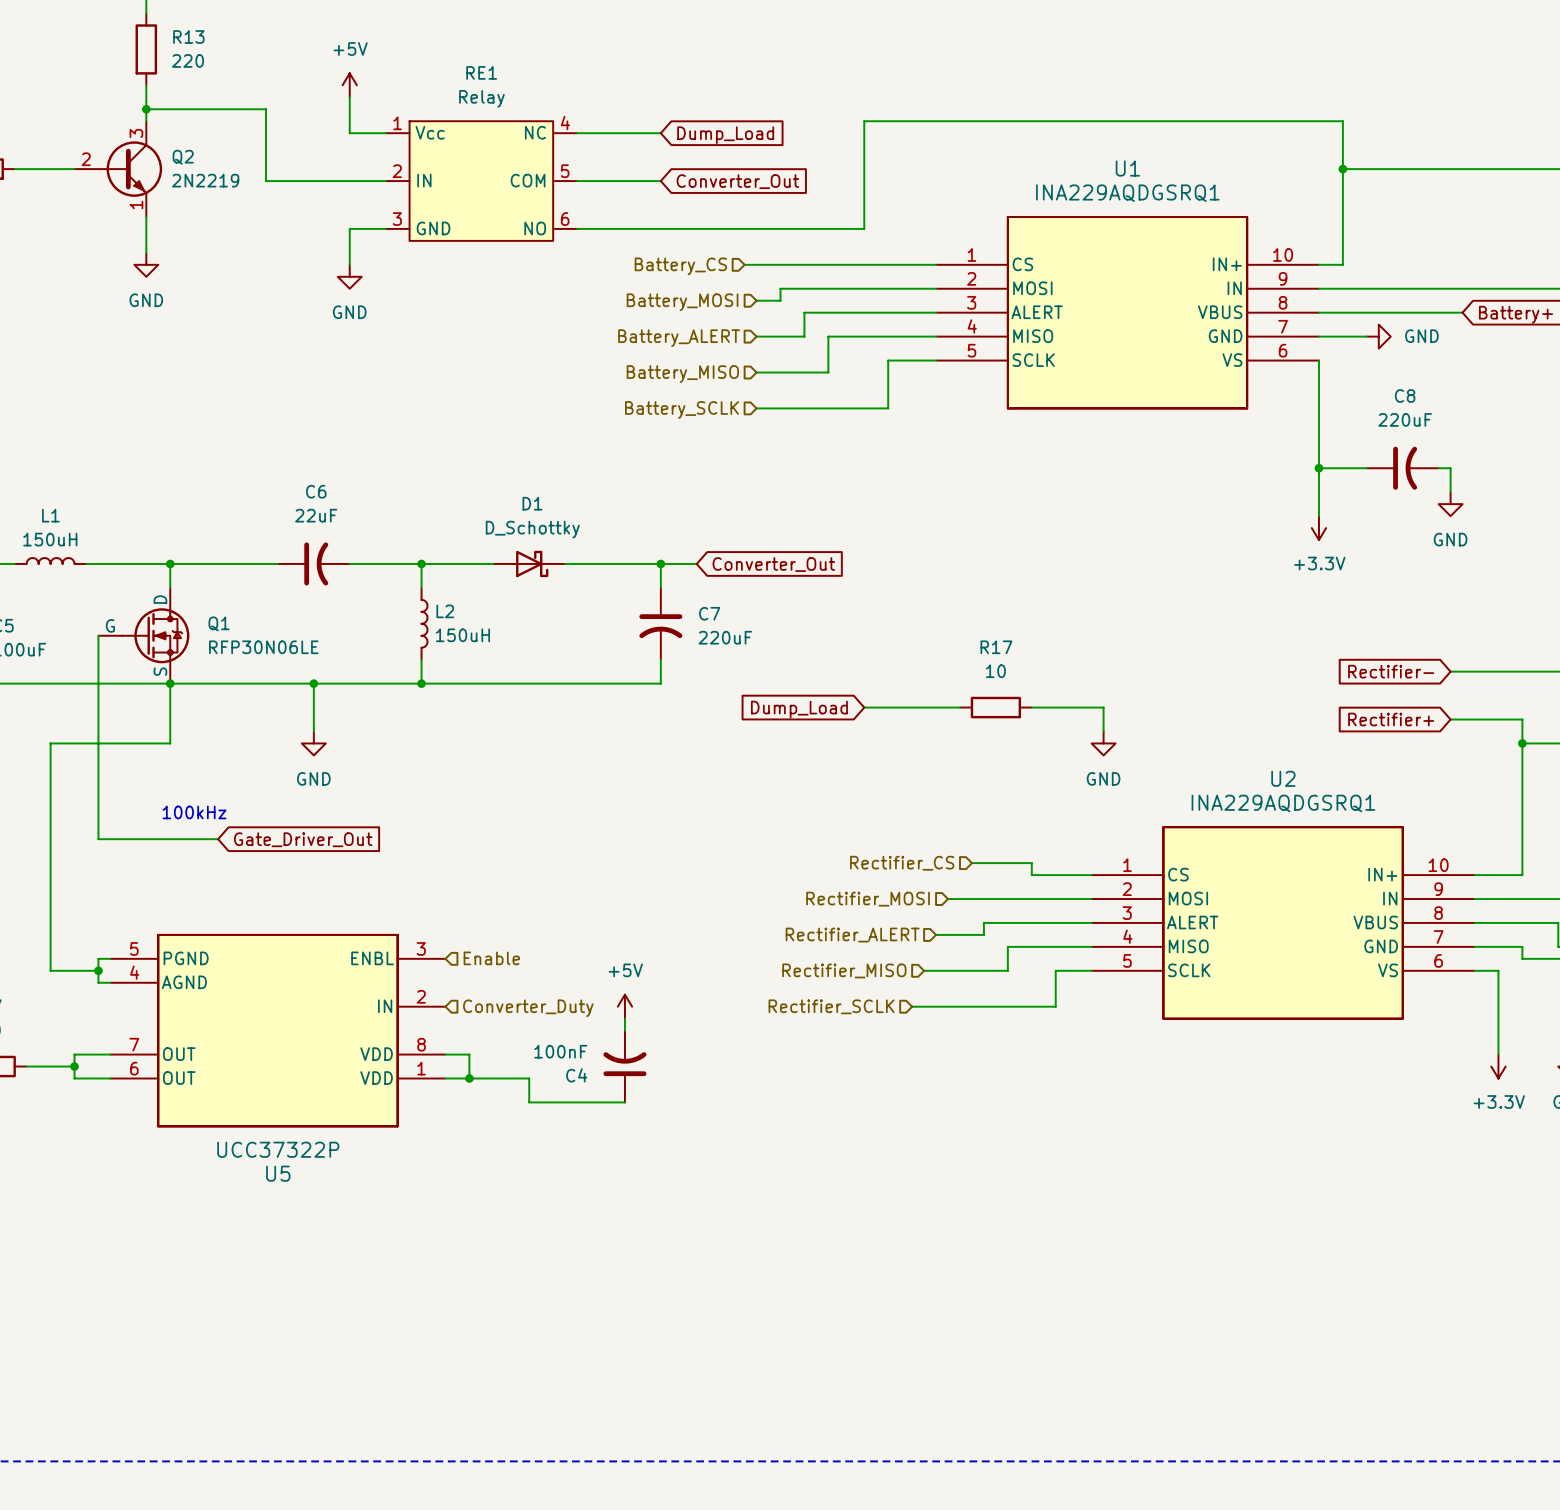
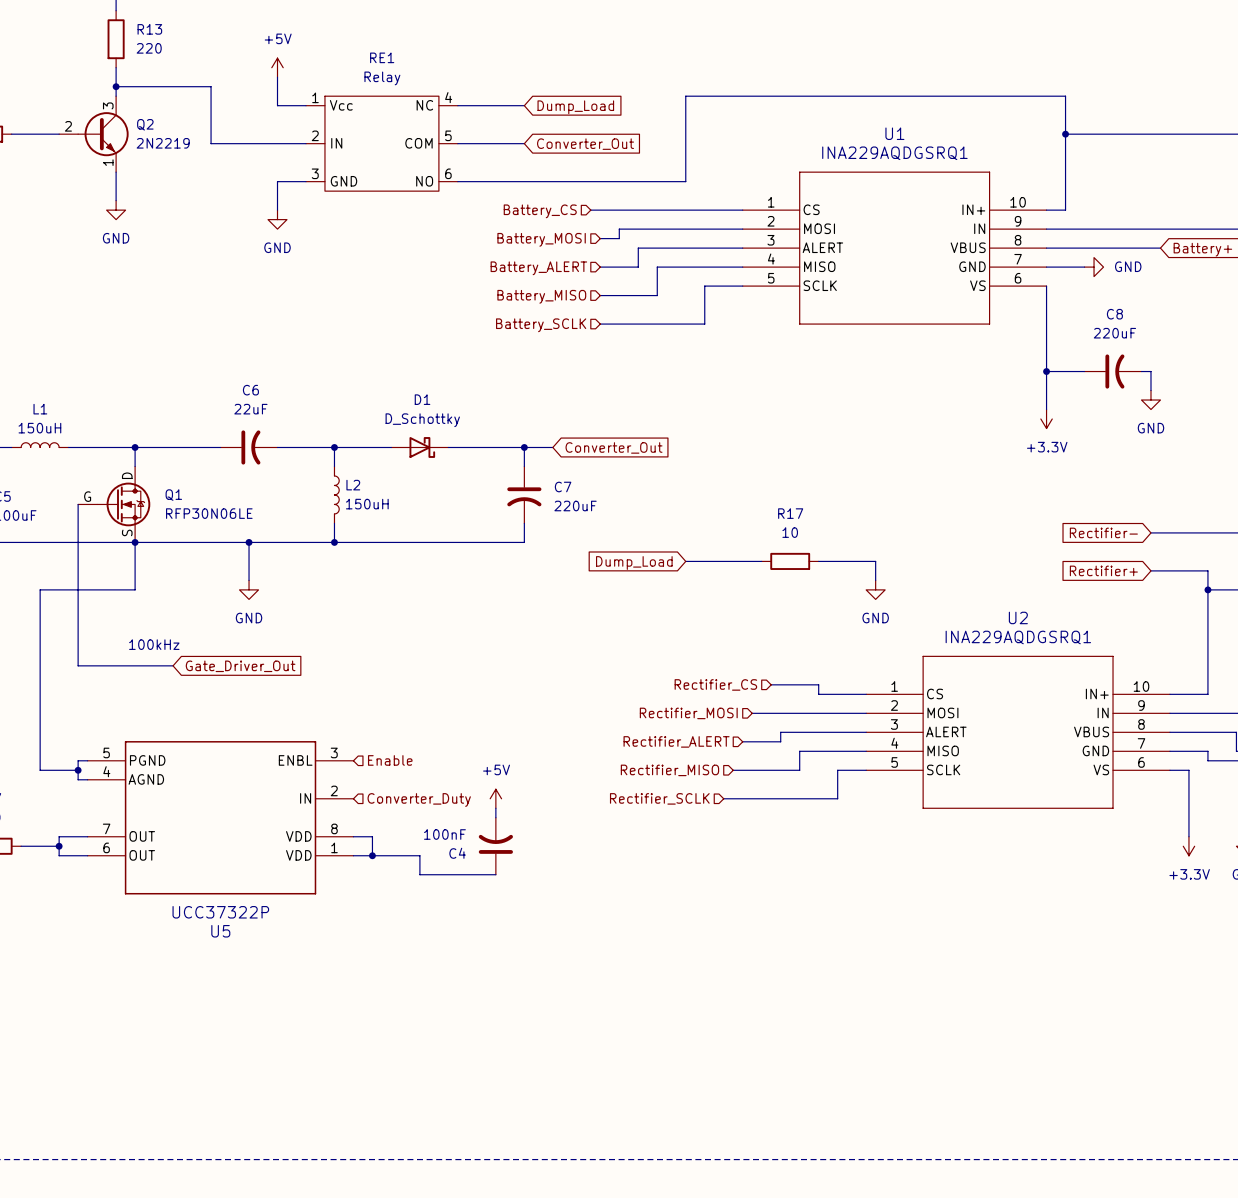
RE1 symbol: [385, 121, 578, 241] -> [305, 96, 458, 192]
U1 symbol: [936, 216, 1319, 410] -> [742, 171, 1047, 325]
U2 symbol: [1091, 826, 1475, 1020] -> [866, 655, 1170, 809]
U5 symbol: [110, 933, 446, 1128] -> [87, 741, 354, 895]

